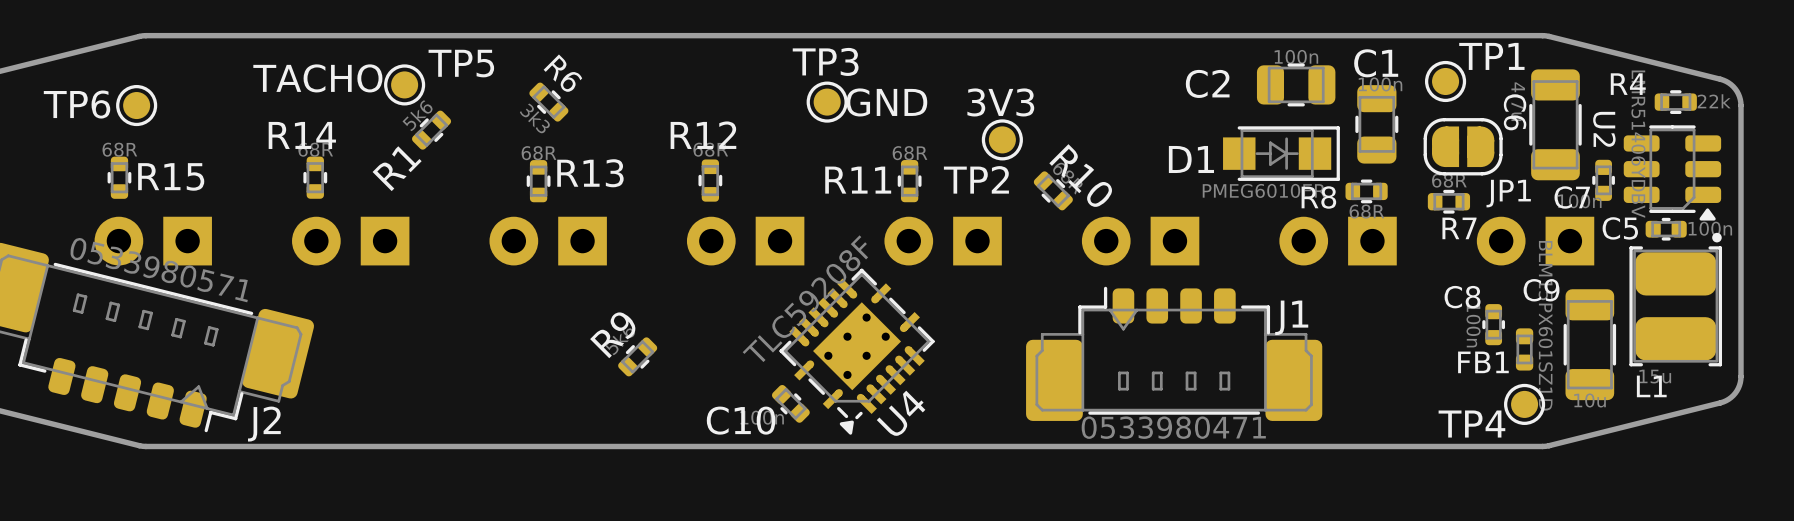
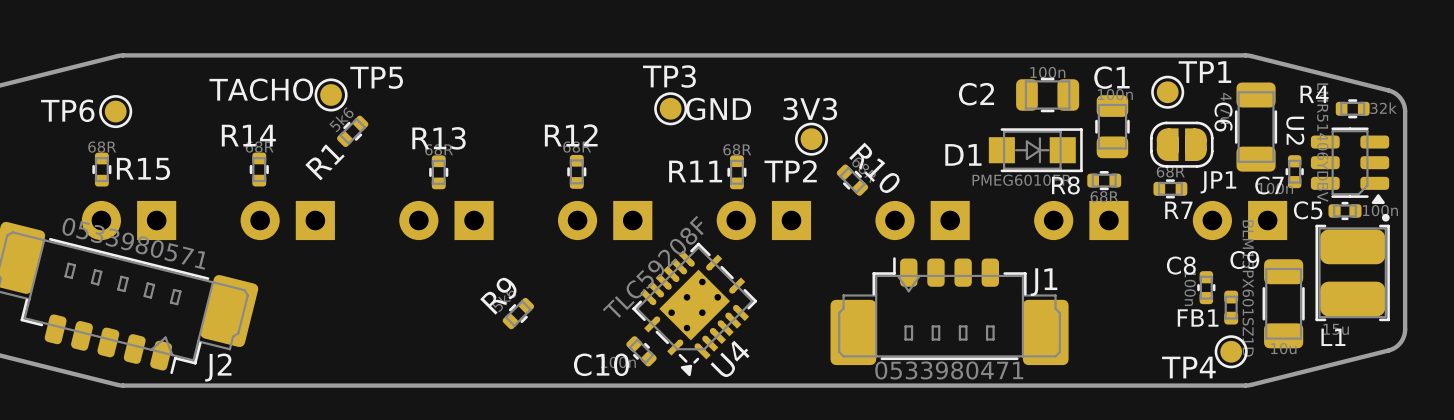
R4 value: 22k (1714, 101) -> 32k (1383, 108)
R6: 3k3 (548, 102) -> none
R13 name position: R13 (590, 173) -> R13 (439, 138)

